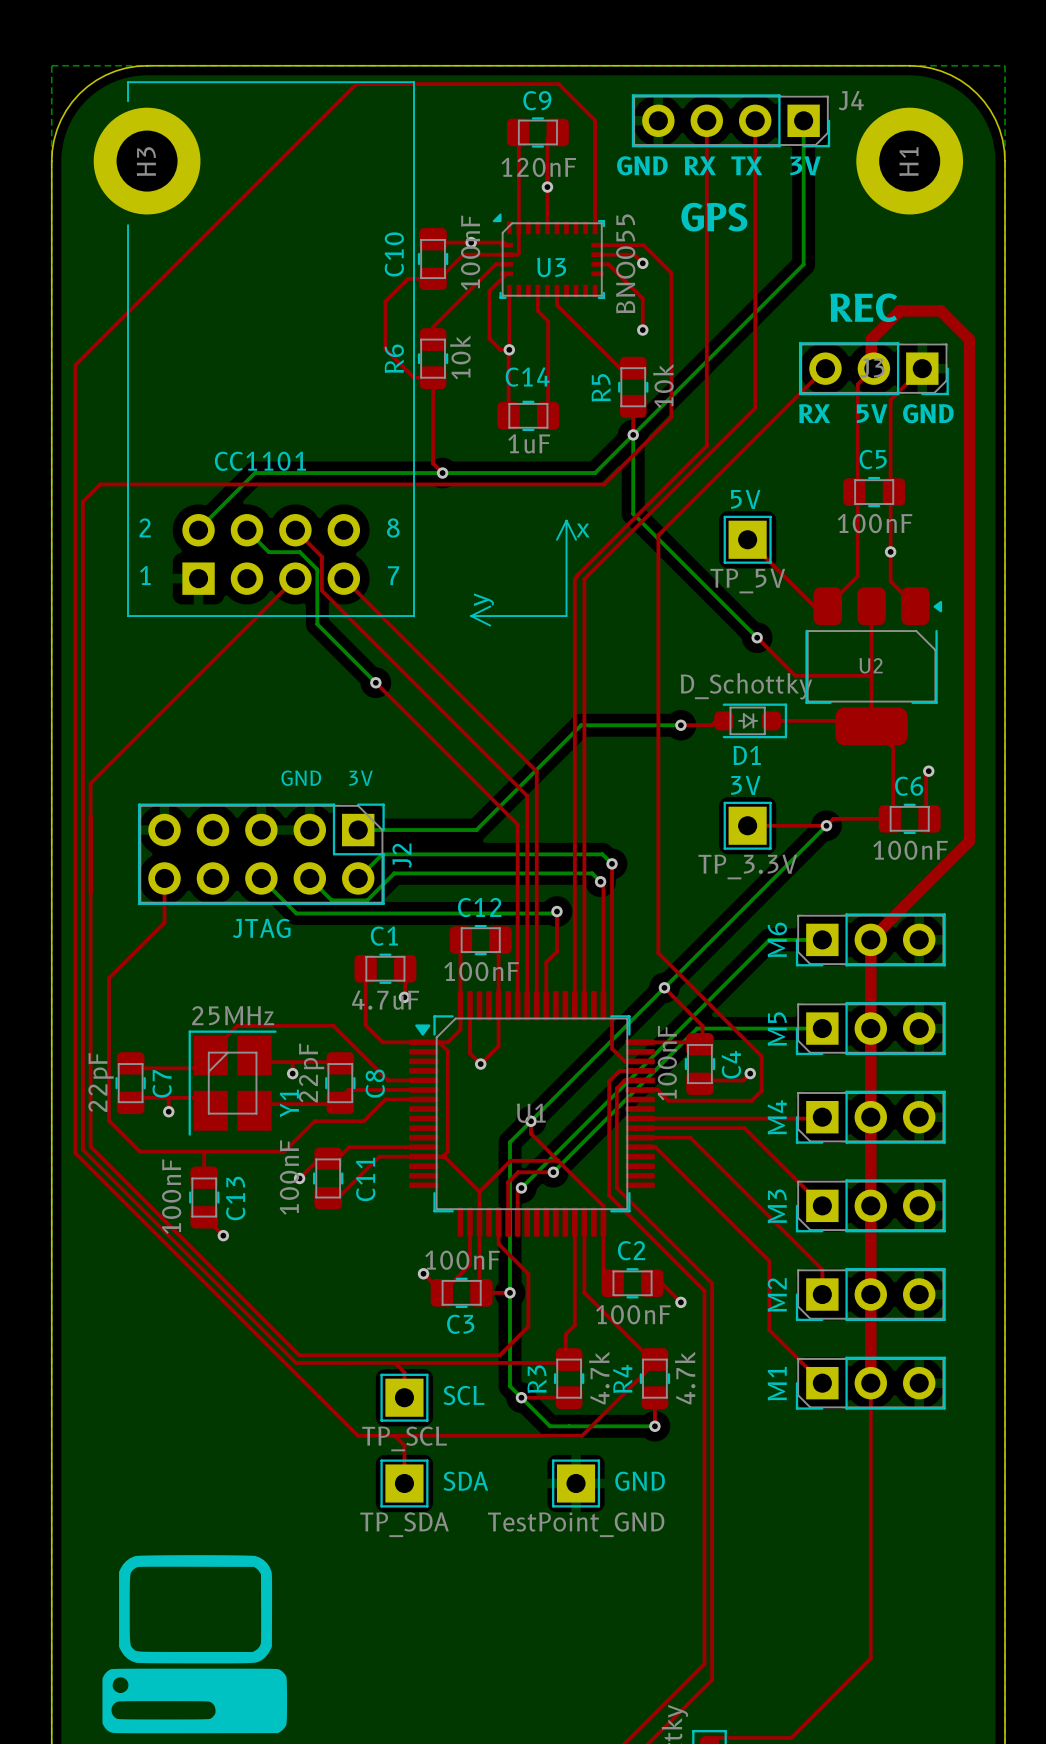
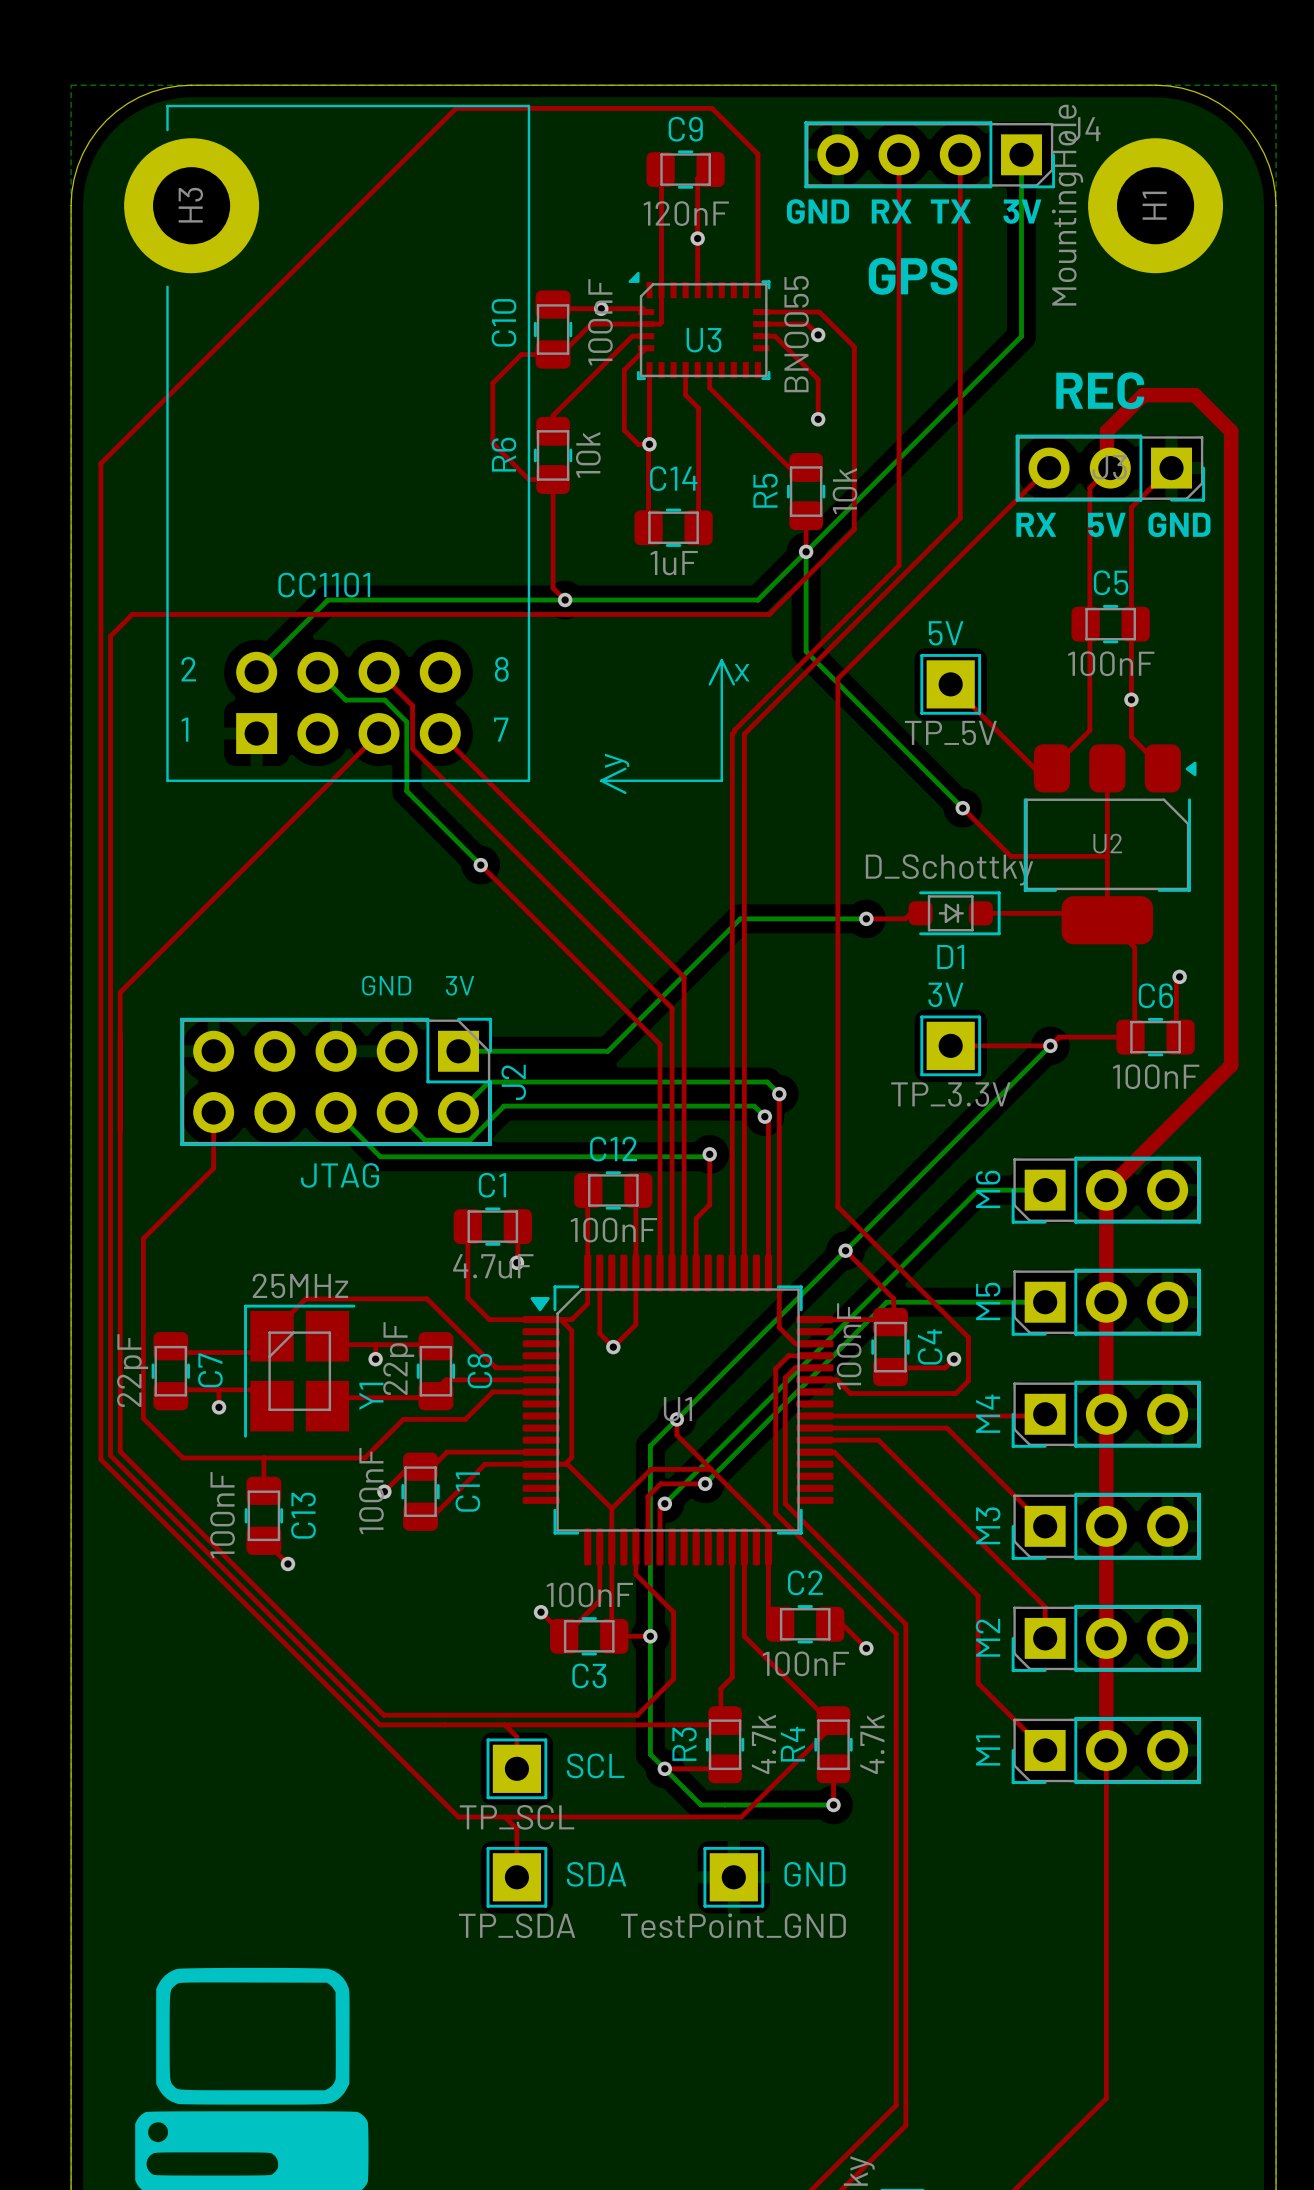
H1 value: none -> MountingHole (1067, 205)

